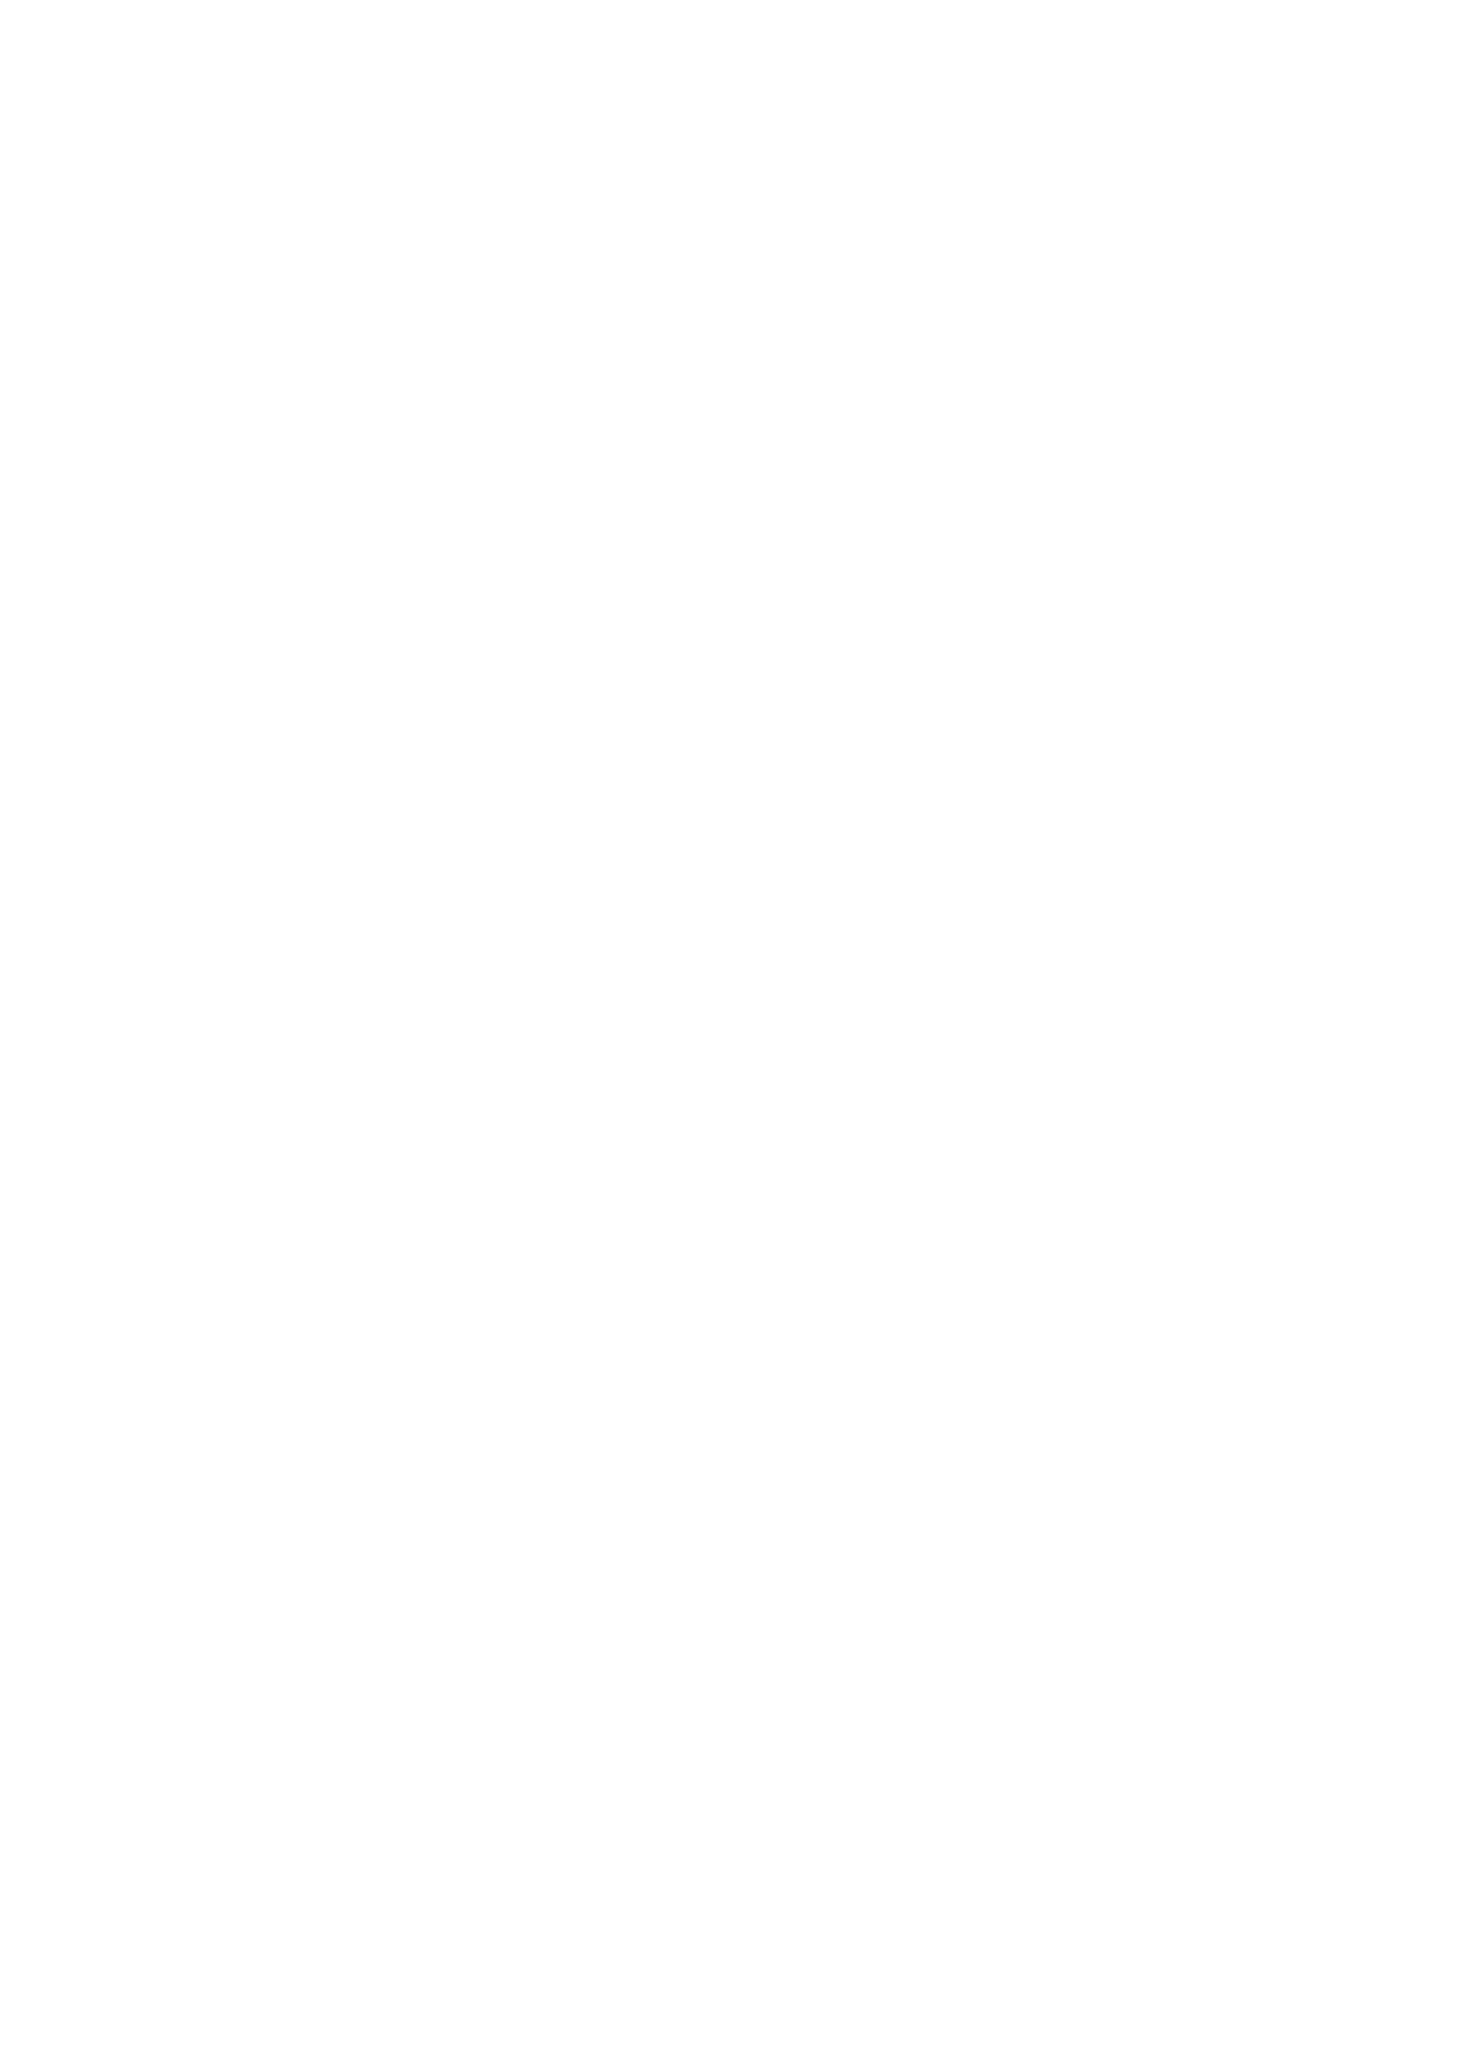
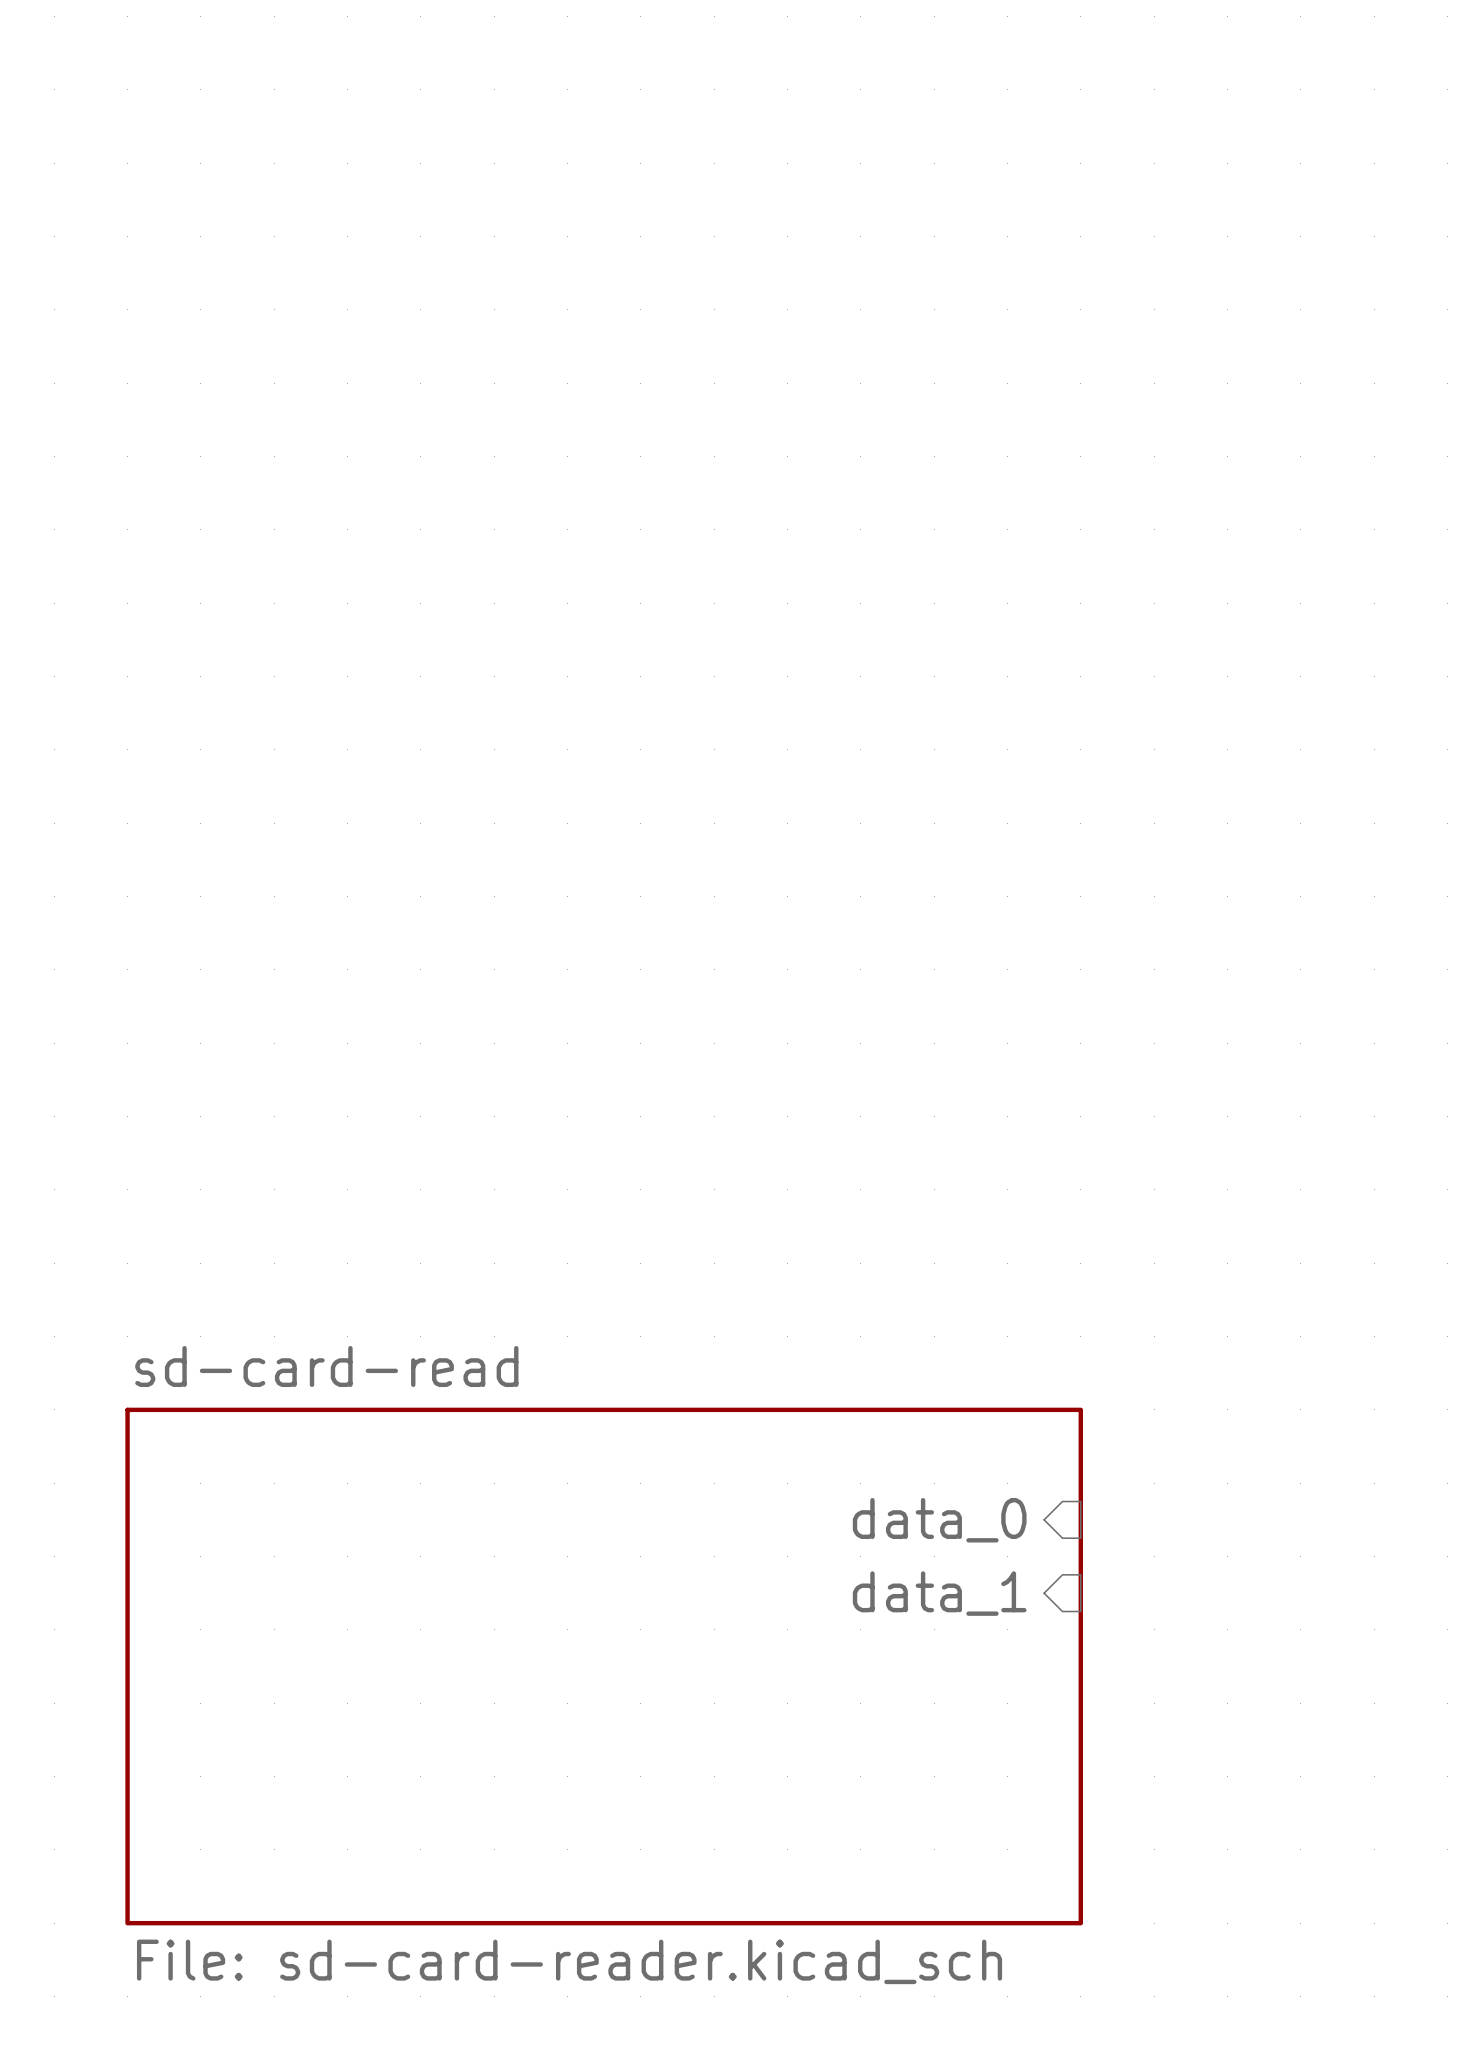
sheet pin: none -> data_0 (939, 1520)
sheet pin: none -> data_1 (939, 1593)
sheet sd-card-read: none -> File: sd-card-reader.kicad_sch (604, 1666)

